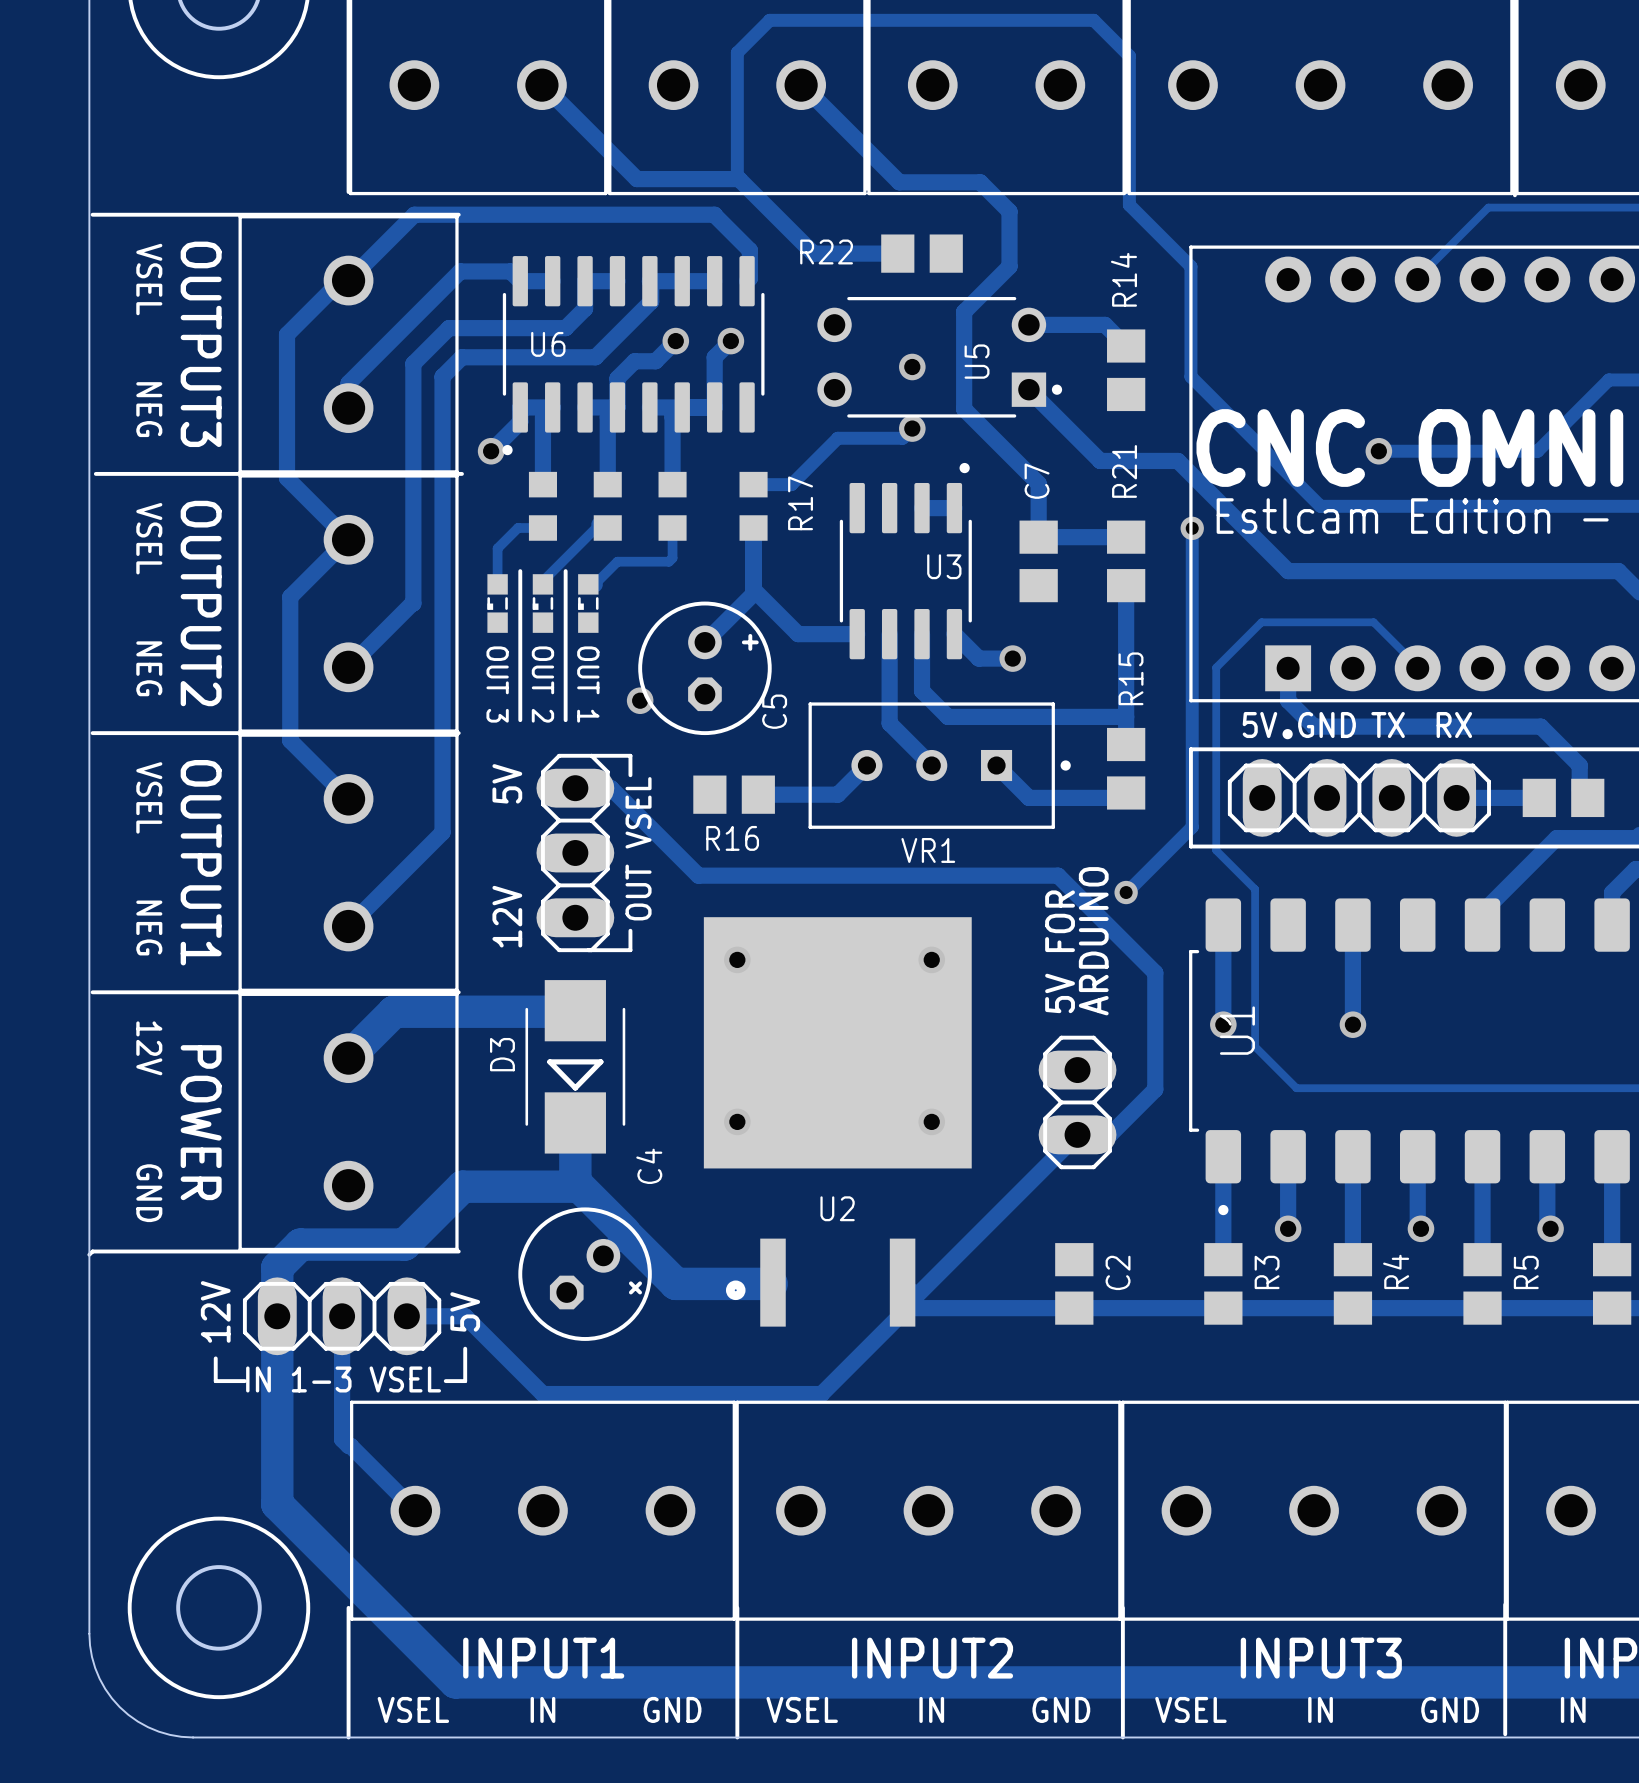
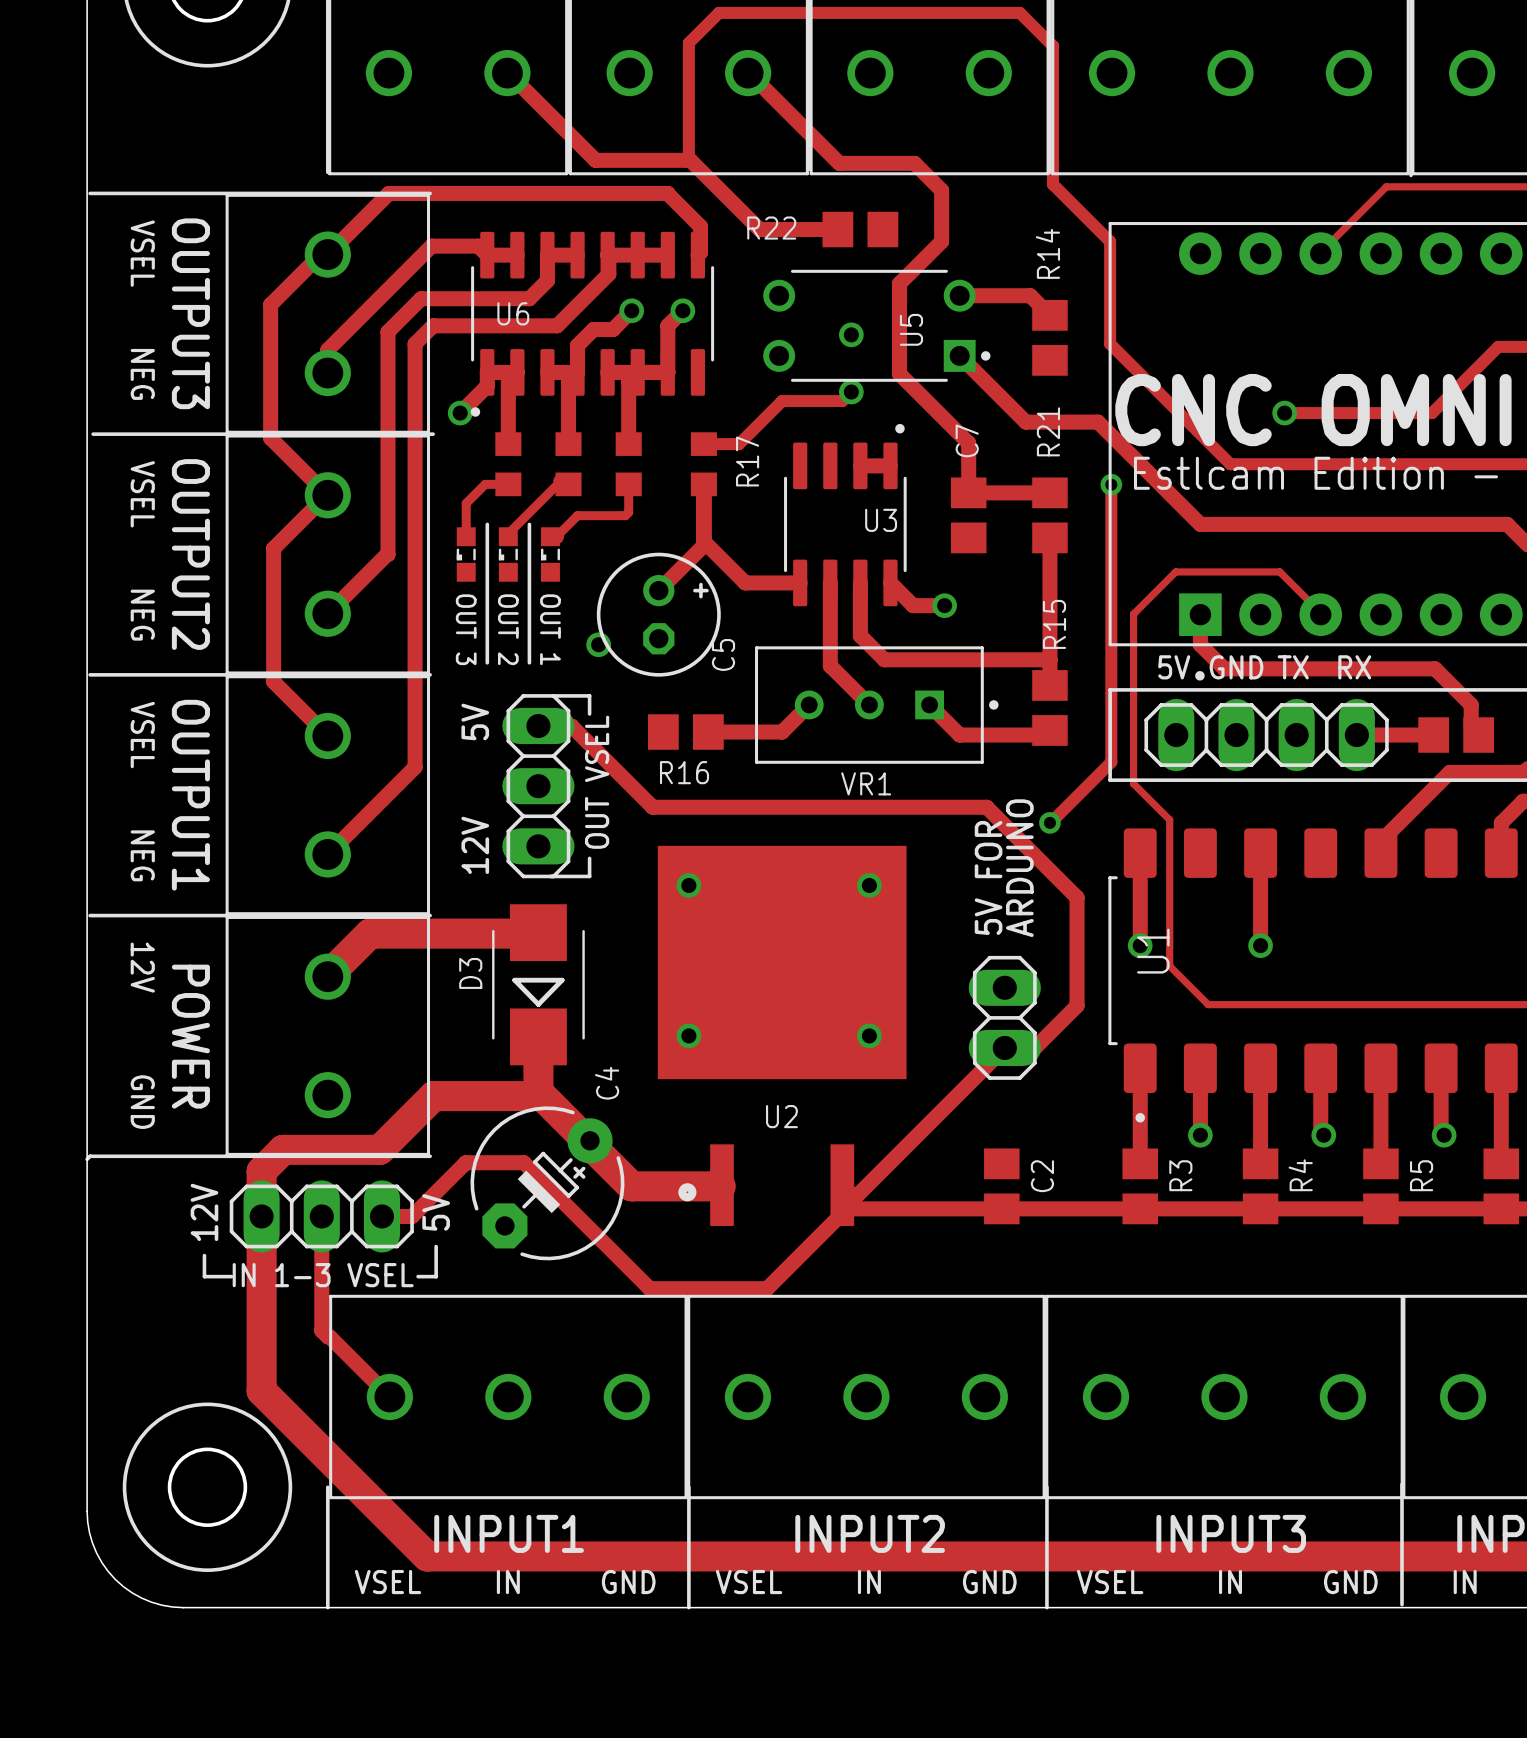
C4 footprint: [518, 1207, 652, 1341] -> [470, 1106, 625, 1261]
track: (439, 1316) (465, 1316) (542, 1394) (695, 1394) -> (412, 1216) (465, 1162) (523, 1162) (649, 1288)

